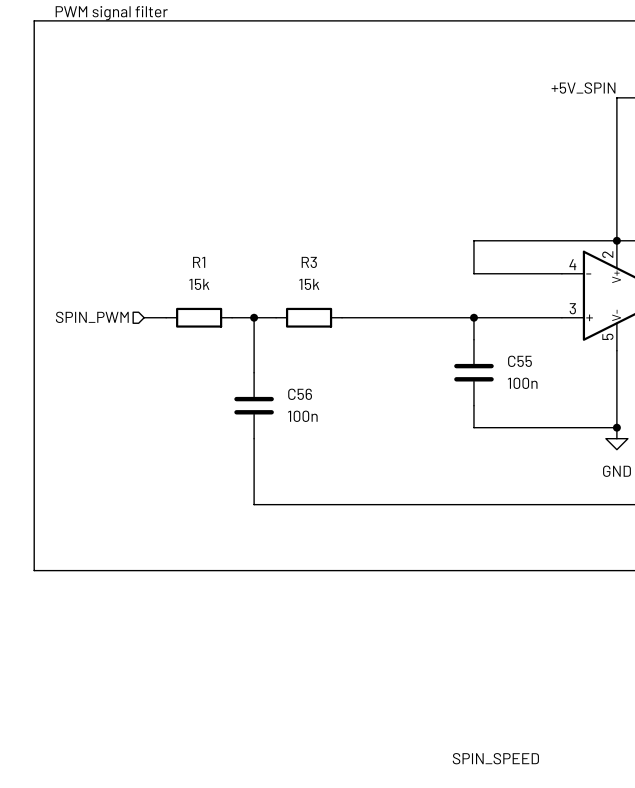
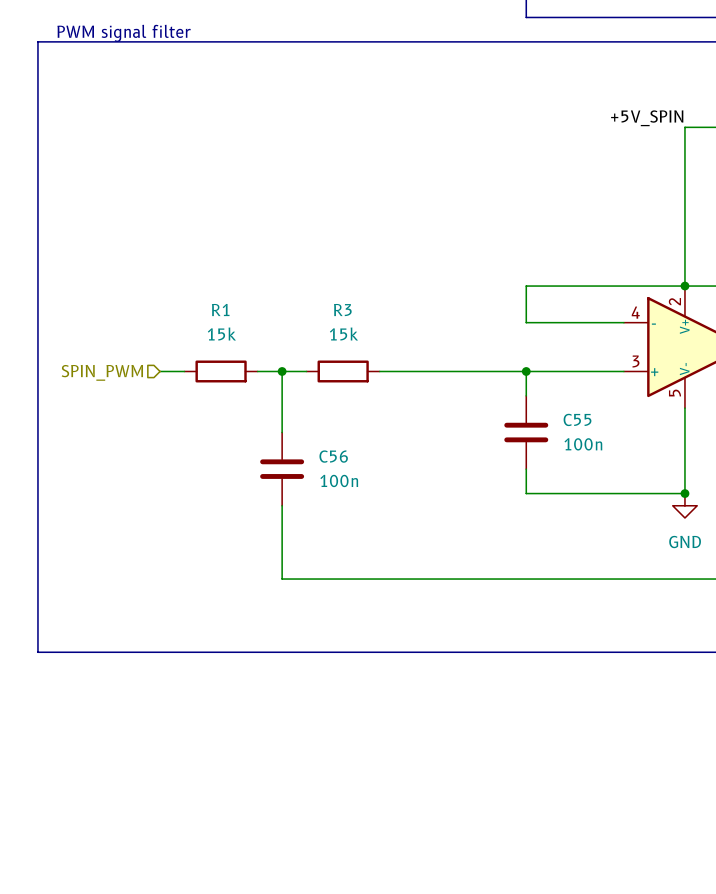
label: SPIN_SPEED (495, 758) -> none

